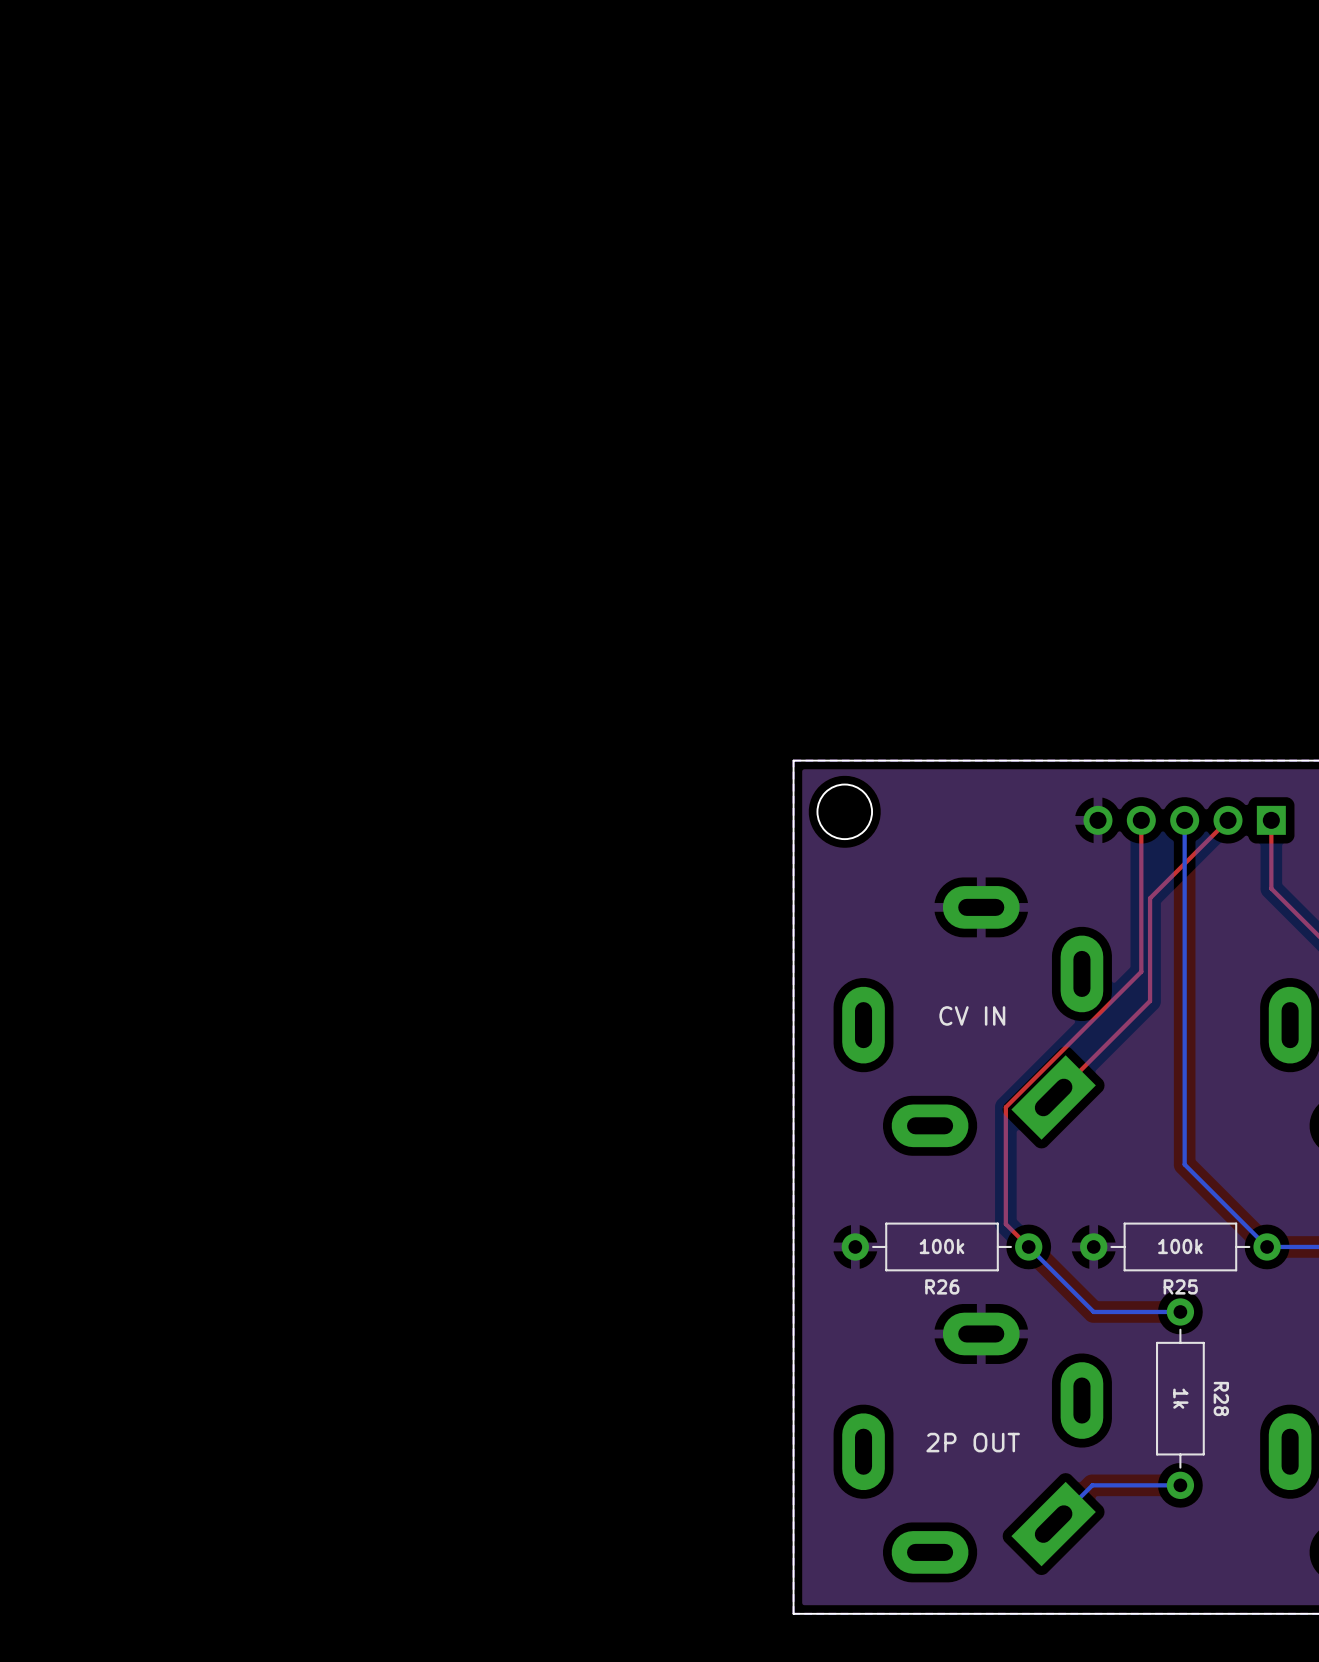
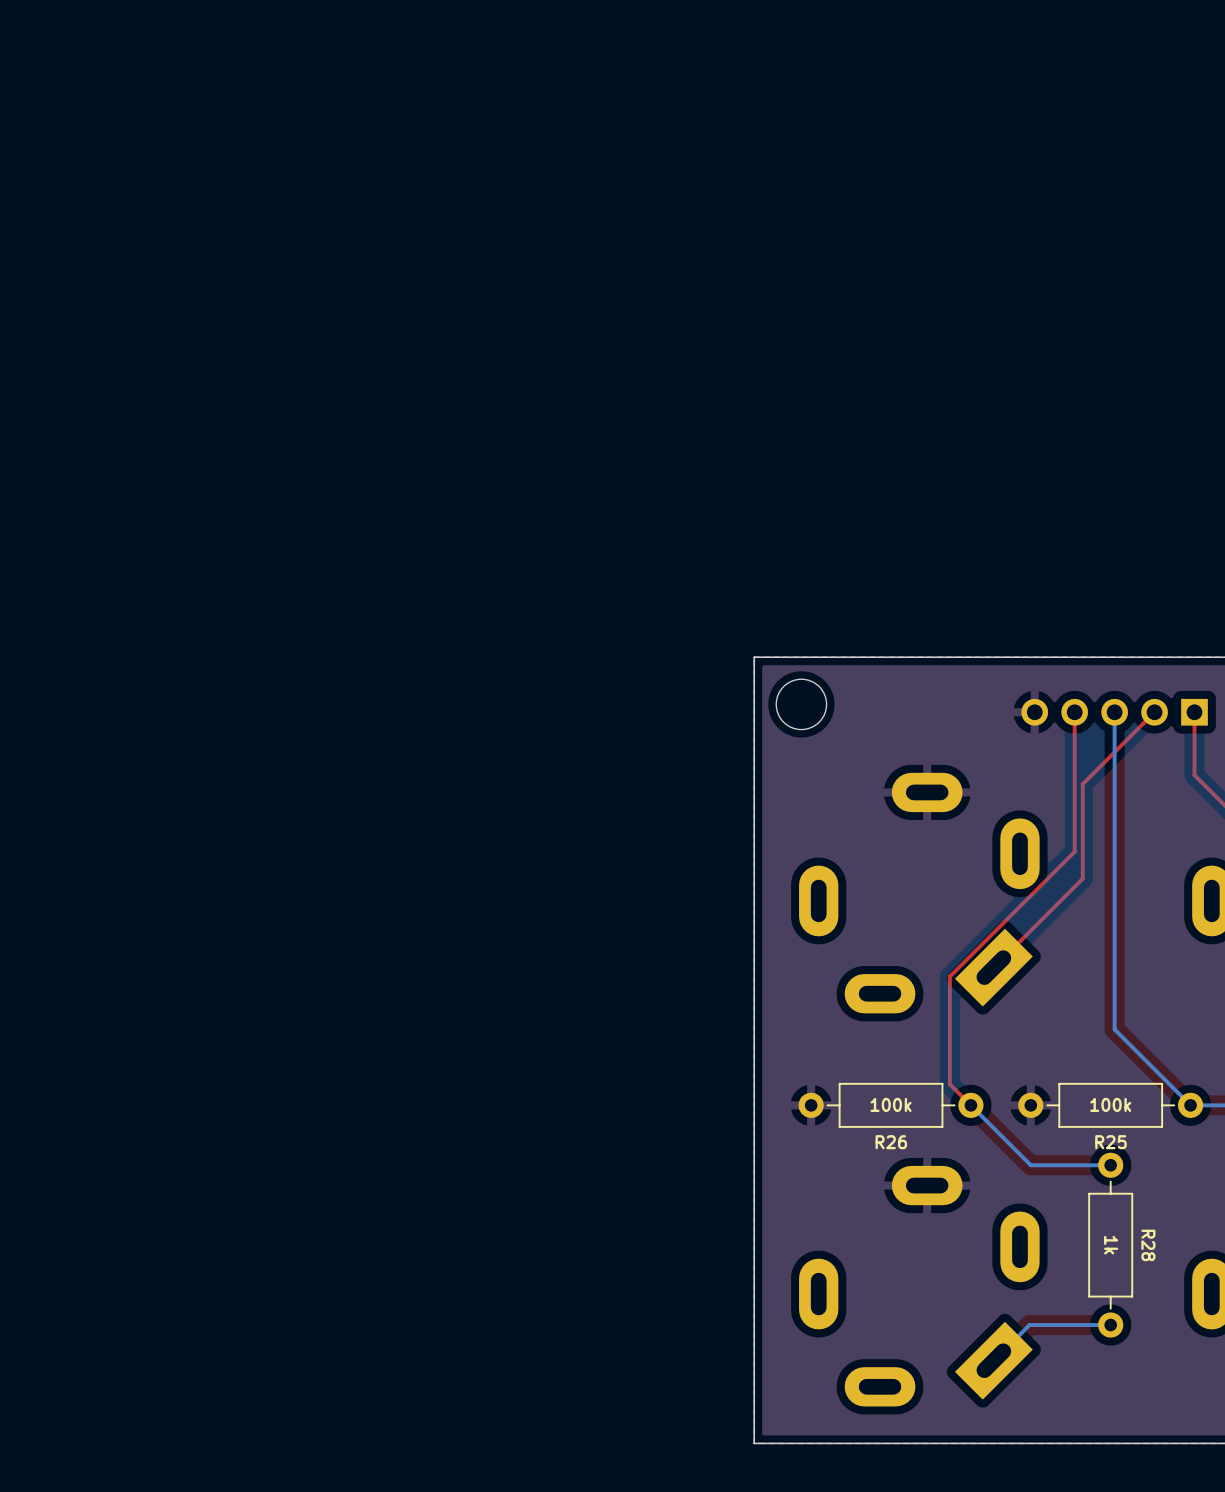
text: CV IN (972, 1015) -> none
text: 2P OUT (973, 1442) -> none

